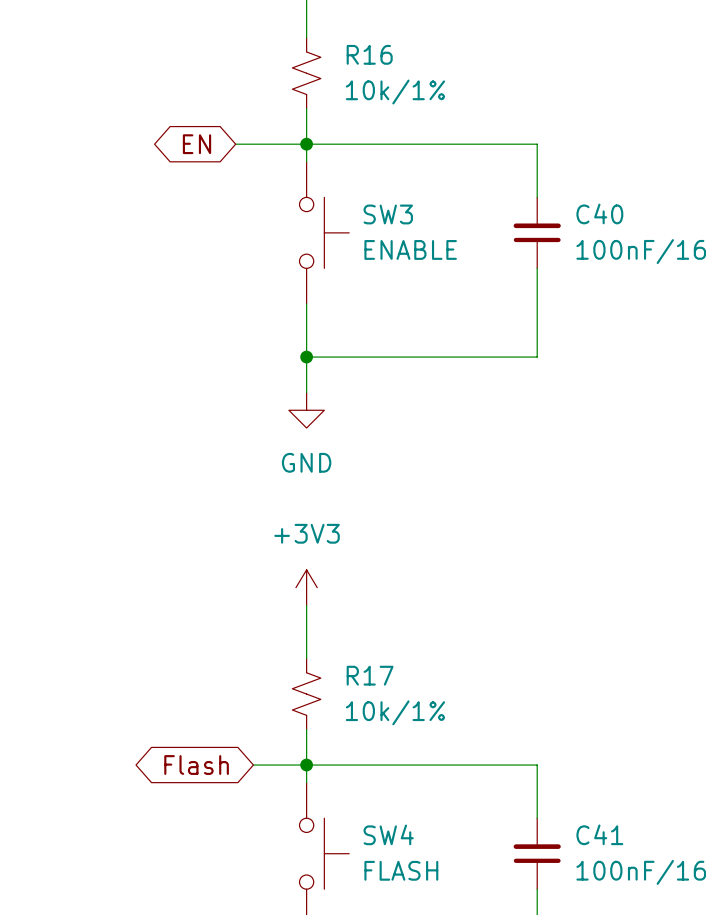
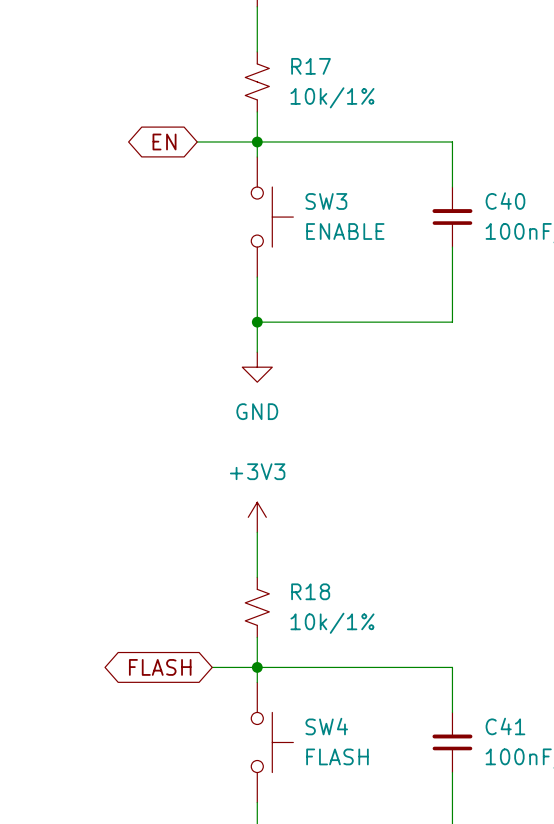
R16 name: R16 (369, 54) -> R17 (311, 66)
R17 name: R17 (370, 675) -> R18 (310, 591)
global label: Flash (196, 765) -> FLASH (160, 667)

